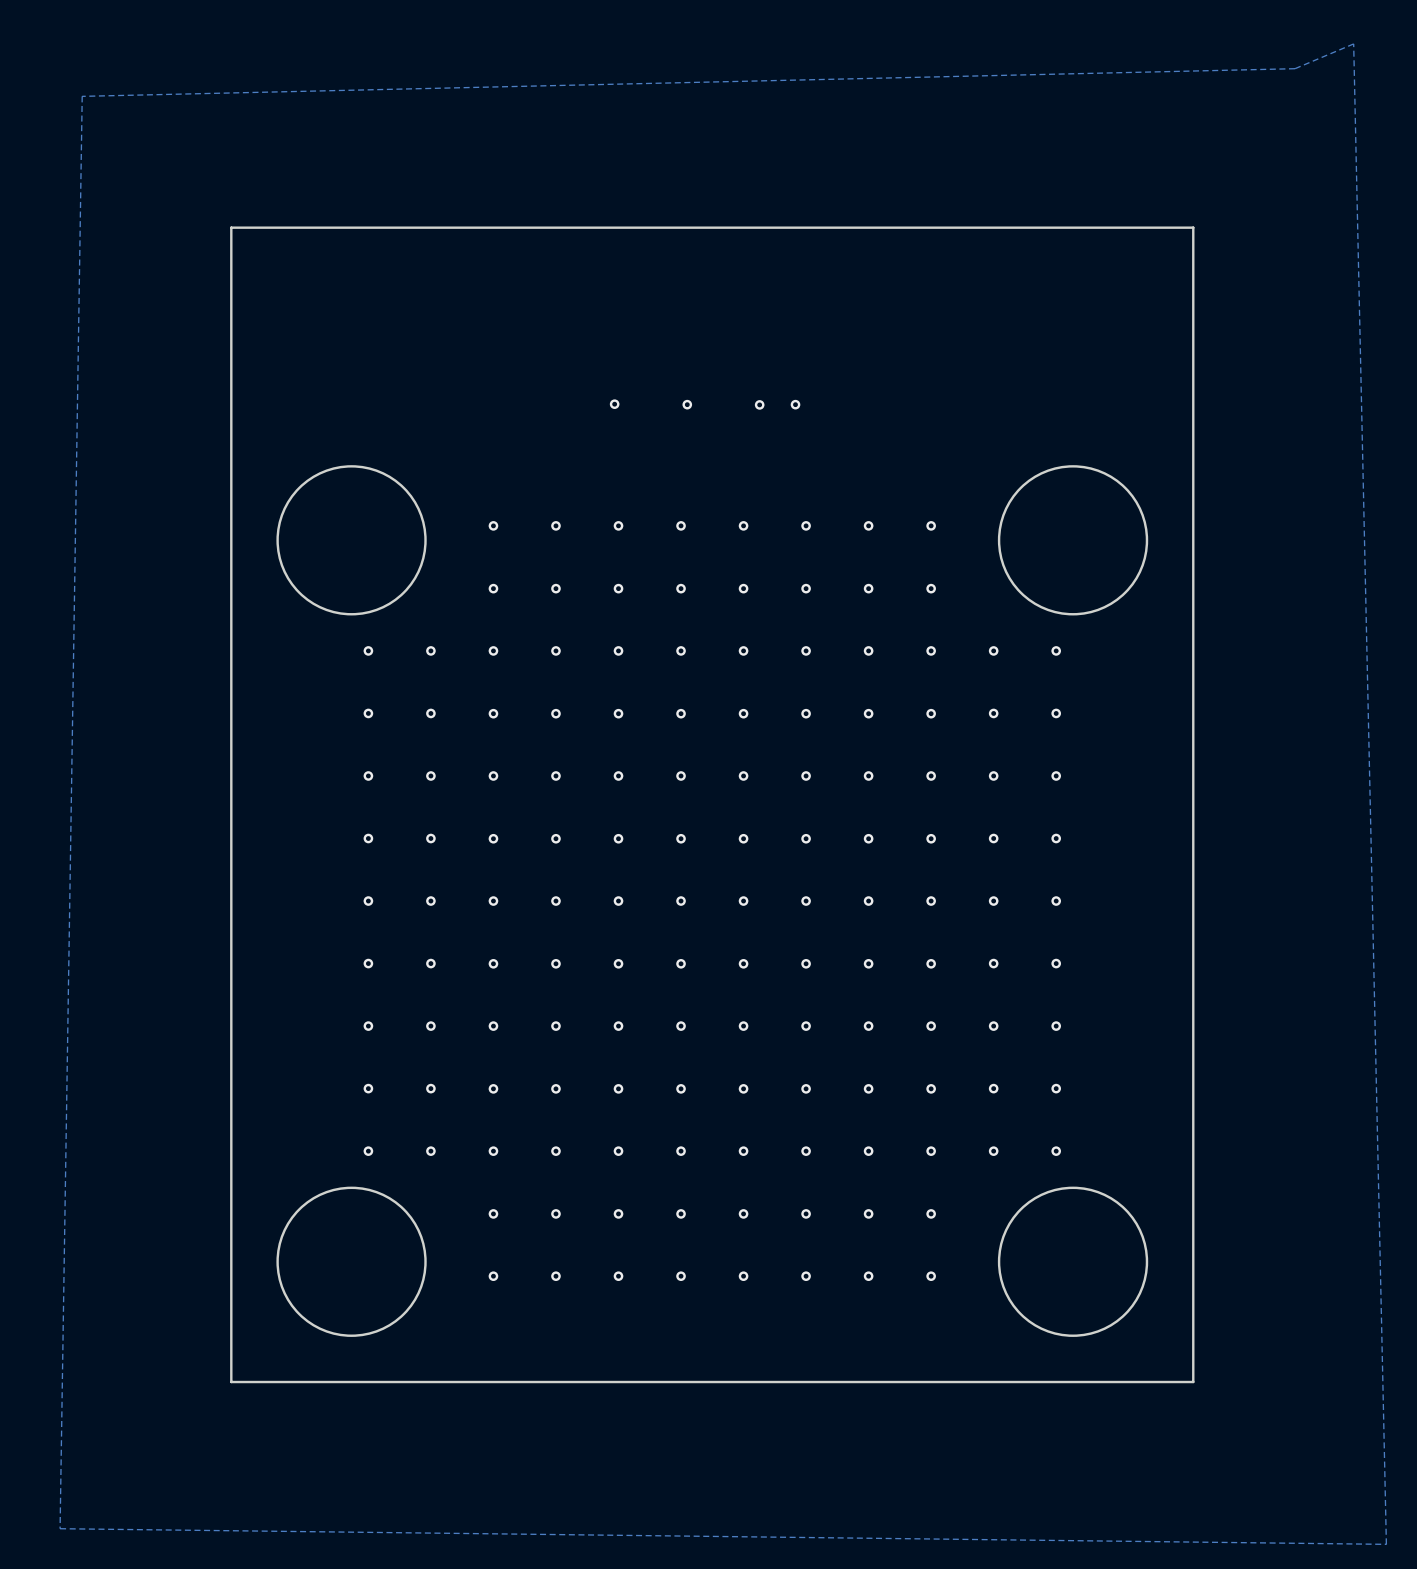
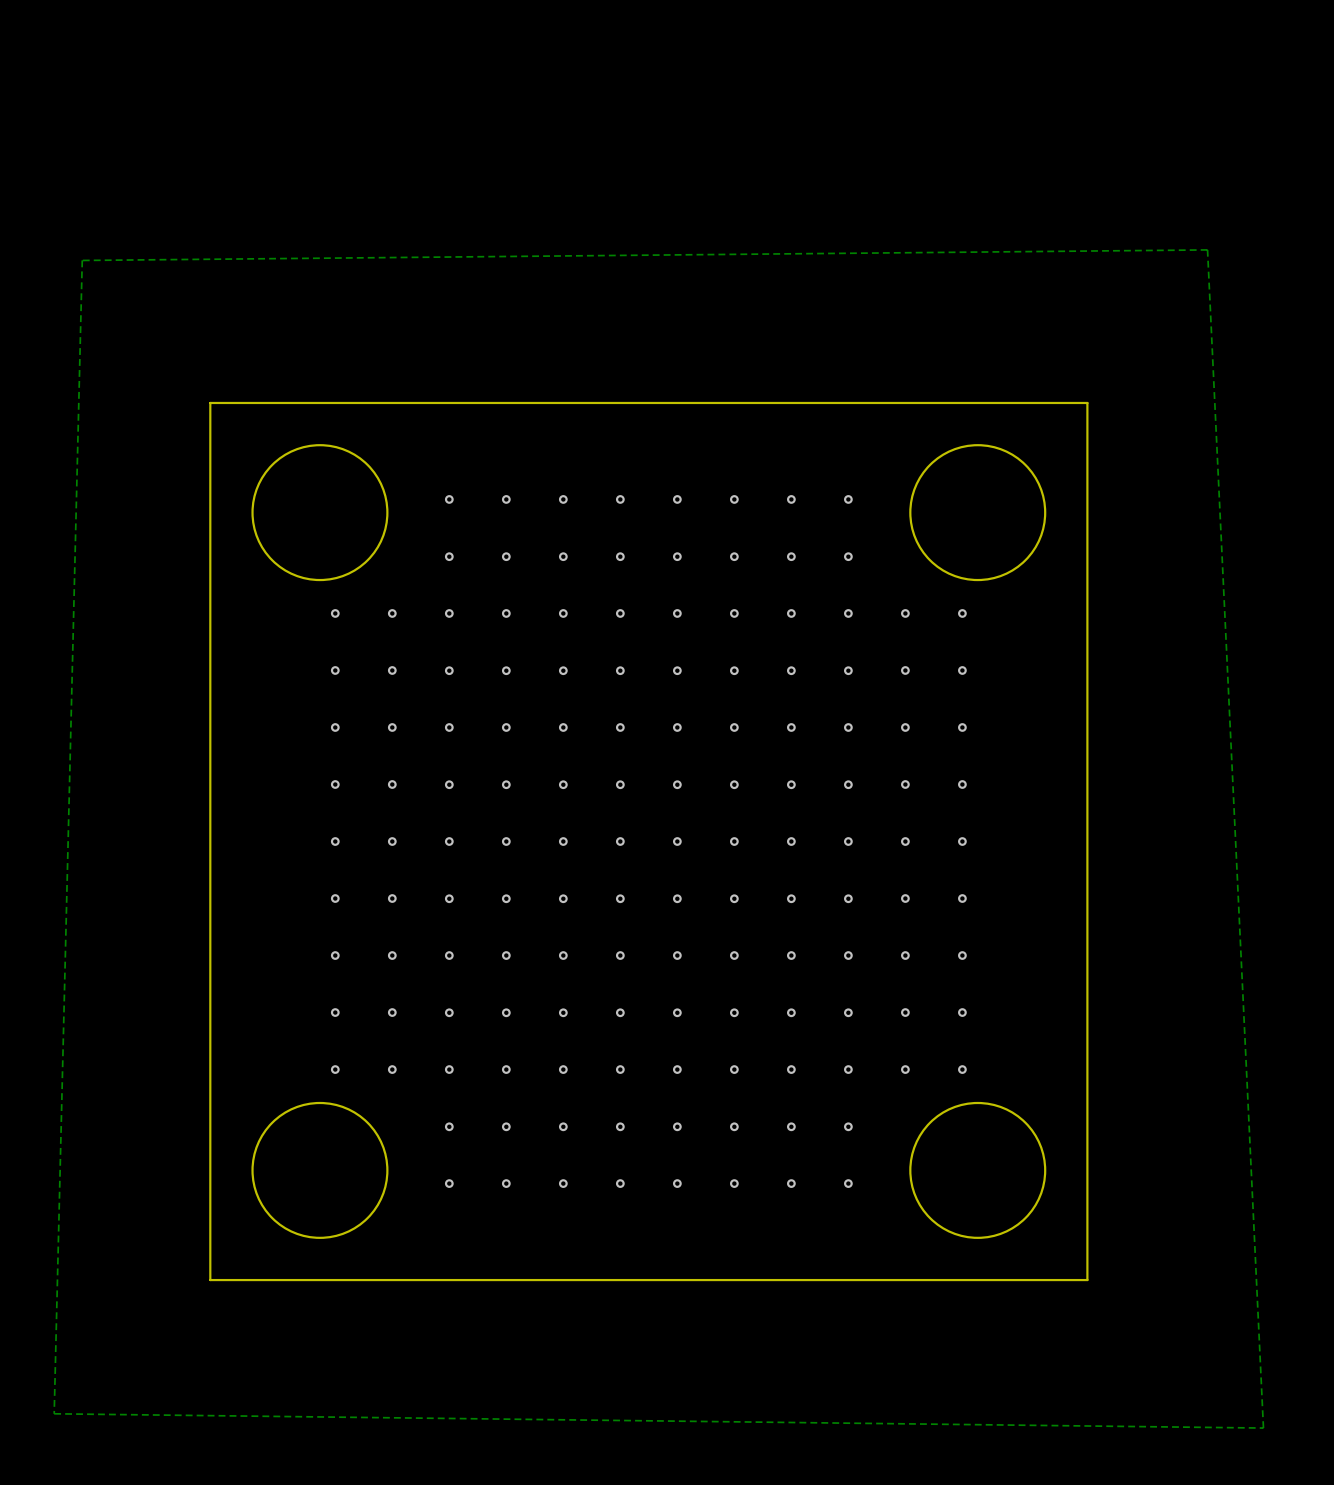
zone outline: none -> (1207, 250) (1263, 1428)
via: (614, 404) -> none
via: (687, 404) -> none
via: (759, 404) -> none
via: (795, 404) -> none
board edge: (1193, 420) (1193, 227) (231, 227) (231, 420) -> (1087, 402) (210, 402)
zone outline: (60, 1528) (82, 96) (1295, 68) (1353, 43) (1386, 1544) -> (54, 1413) (82, 260) (1207, 249)

